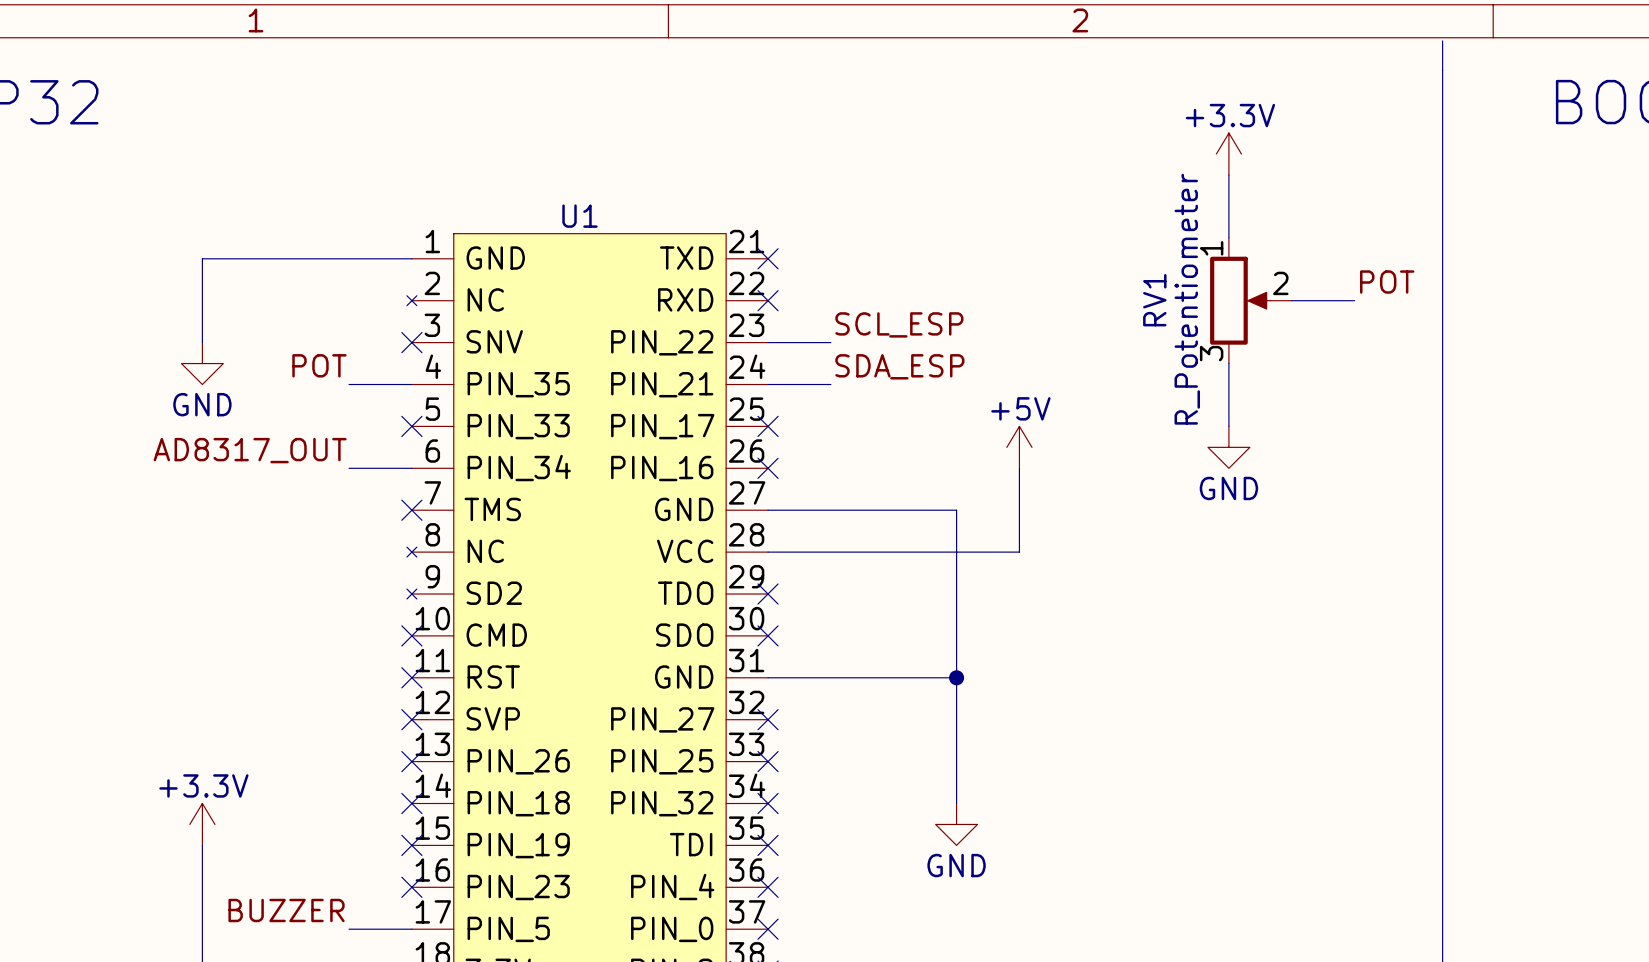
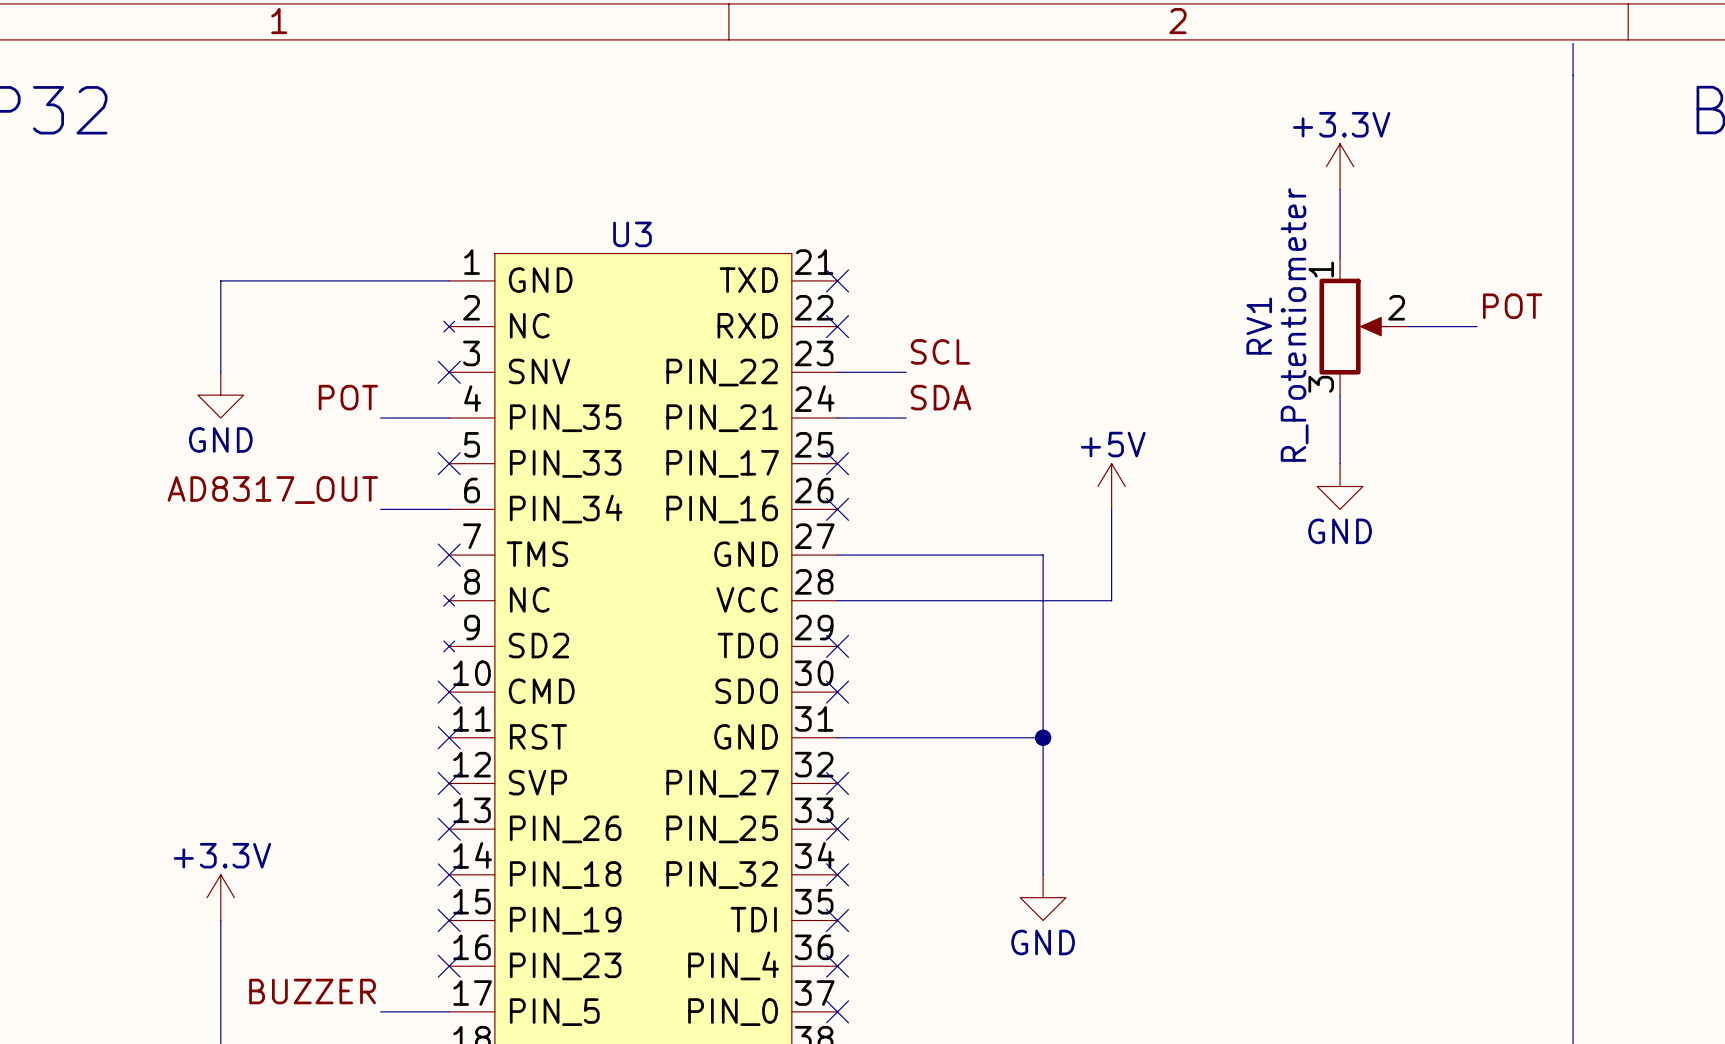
U1 name: U1 (579, 216) -> U3 (632, 234)
label: SCL_ESP (899, 324) -> SCL (940, 351)
label: SDA_ESP (899, 366) -> SDA (941, 397)

